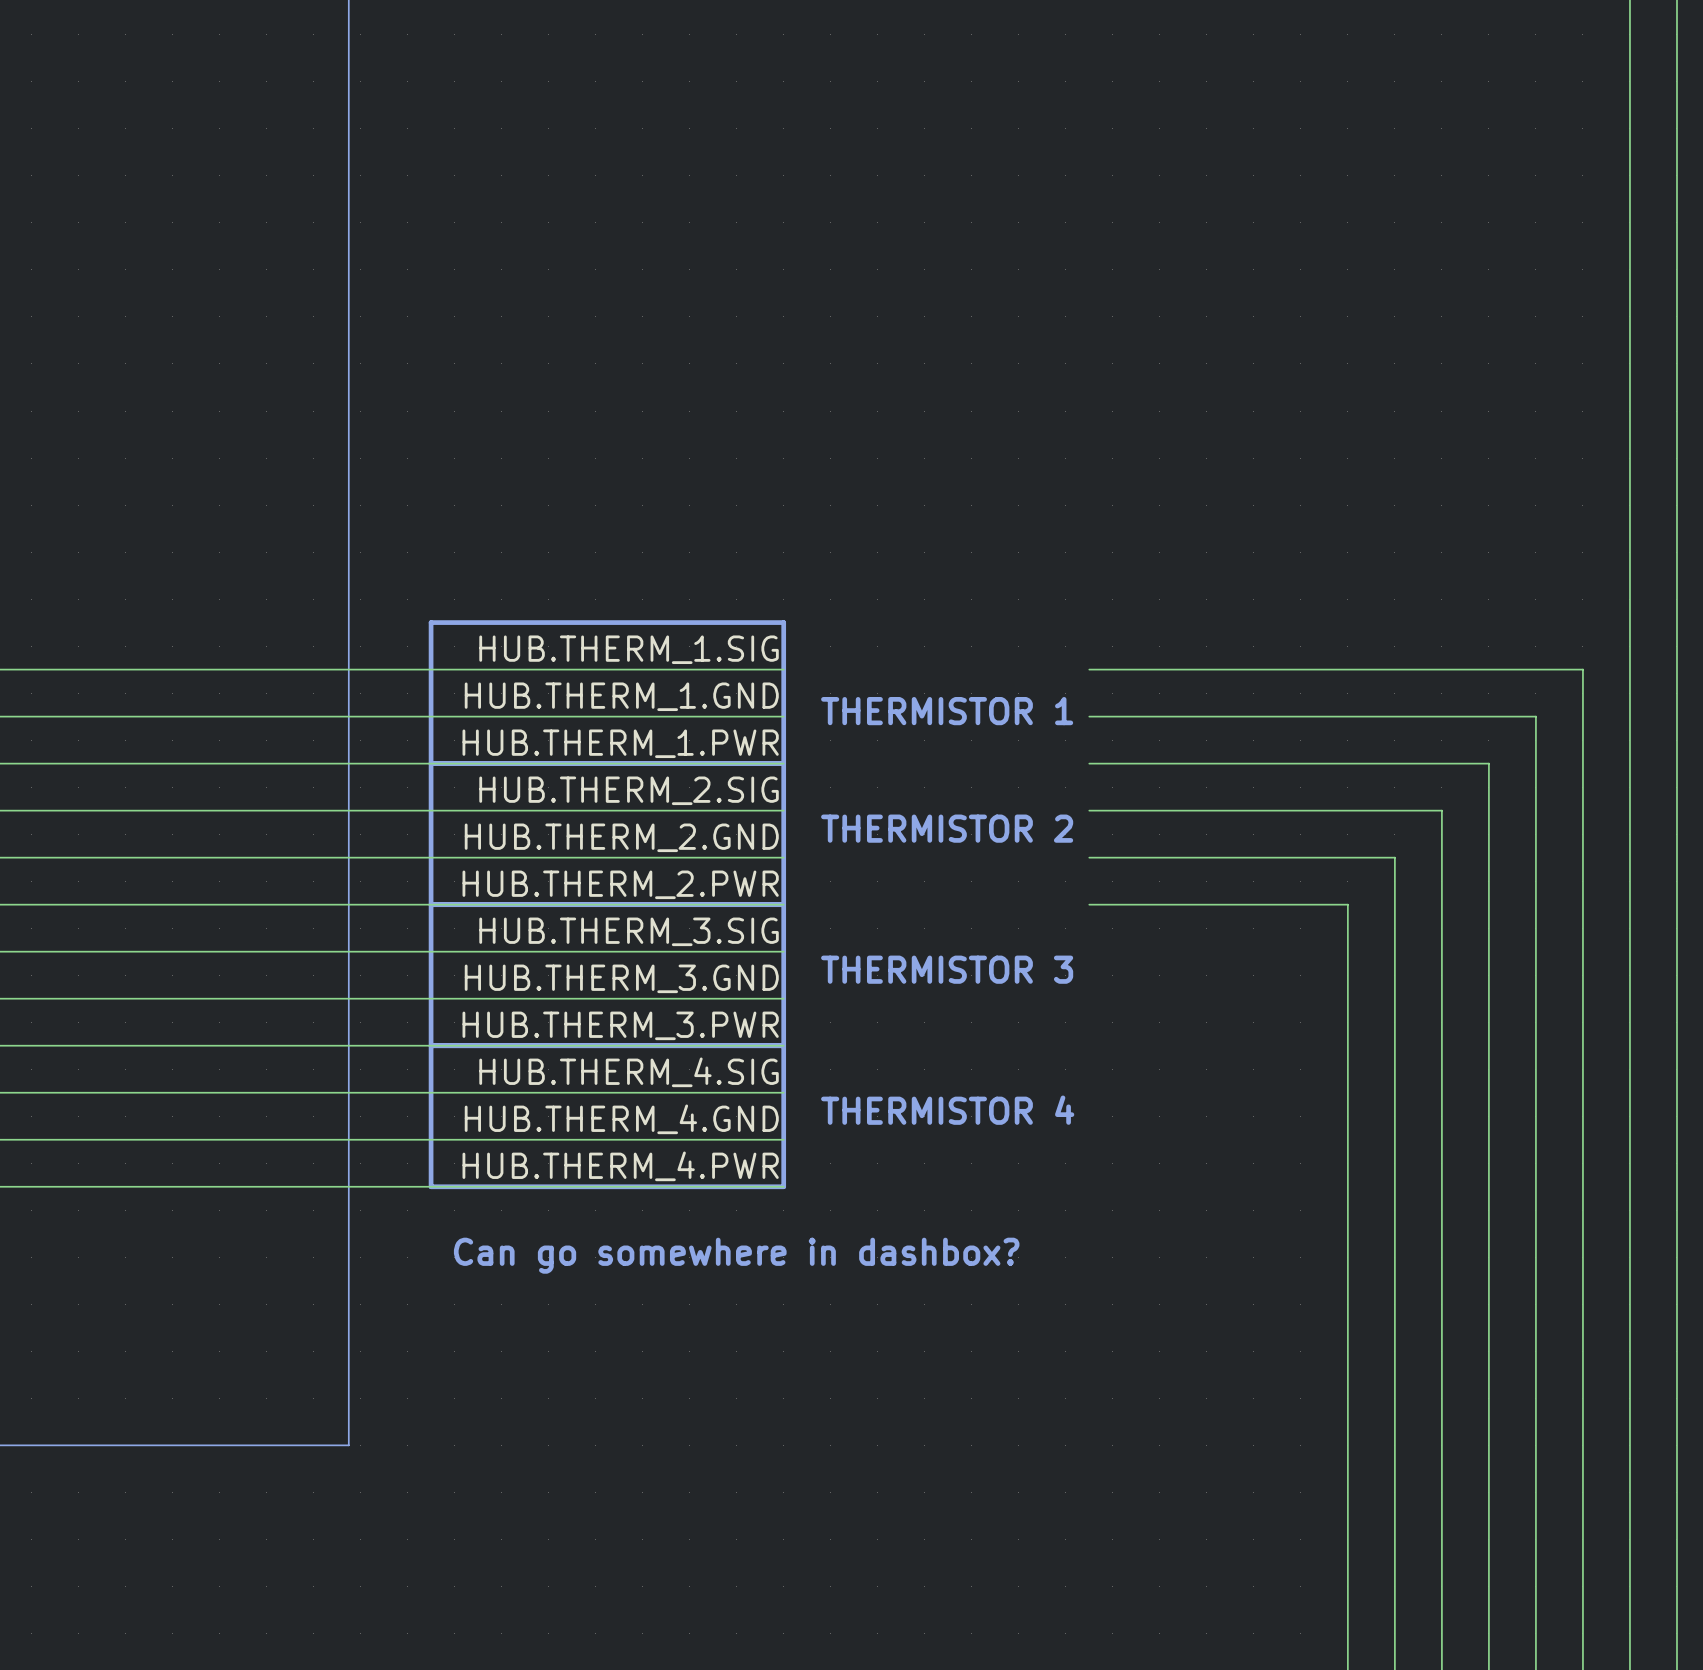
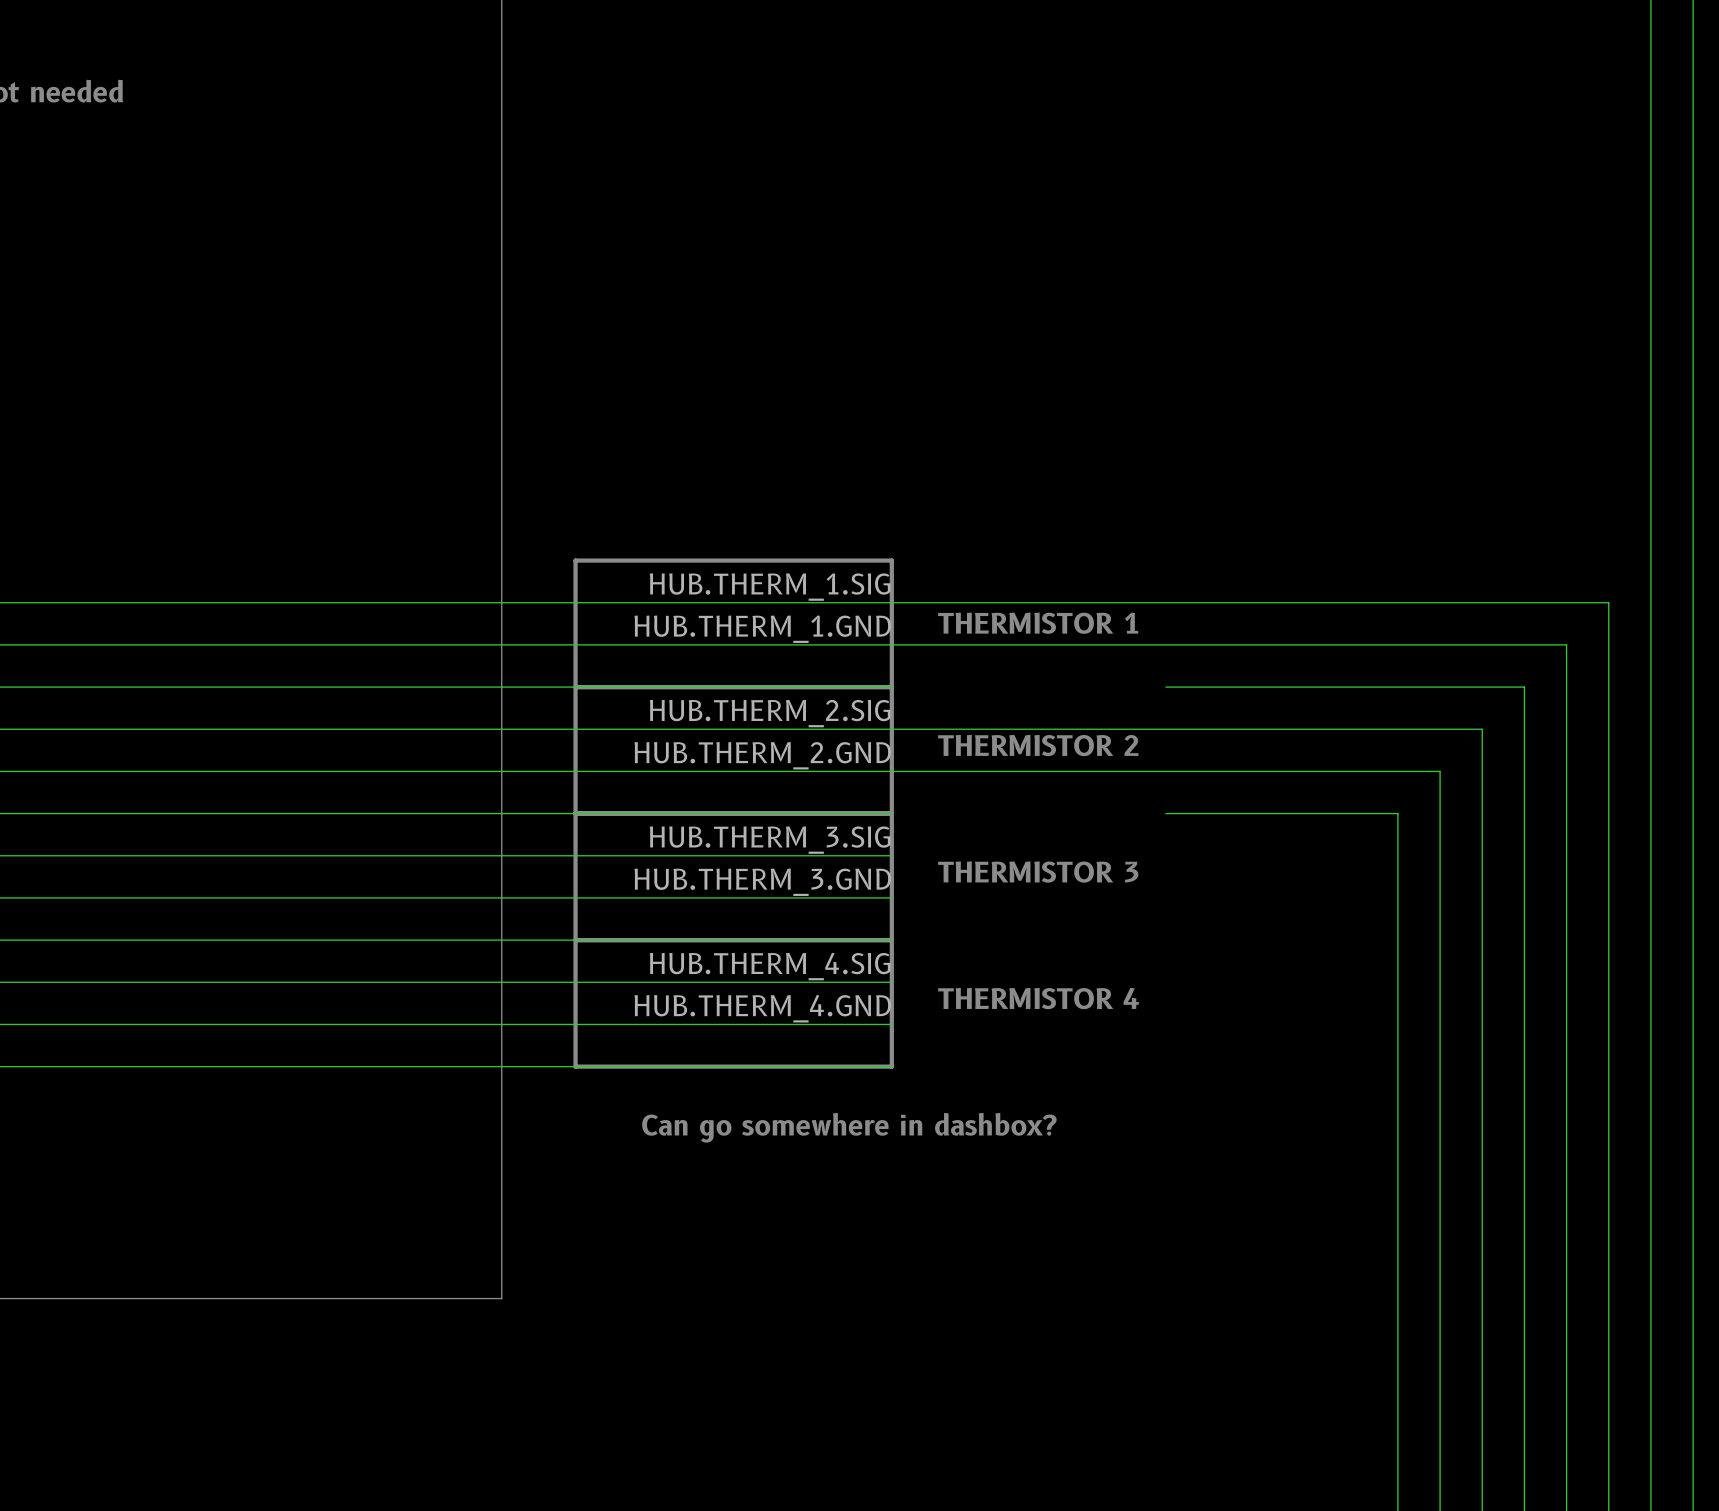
wire: none -> (891, 602) (1165, 602)
text position: THERMISTOR 1 (947, 711) -> THERMISTOR 1 (1038, 623)
wire: none -> (891, 644) (1165, 644)
label: HUB.THERM_1.PWR (620, 743) -> none
wire: none -> (891, 729) (1165, 729)
wire: none -> (891, 771) (1165, 771)
label: HUB.THERM_2.PWR (620, 884) -> none
label: HUB.THERM_3.PWR (620, 1025) -> none
label: HUB.THERM_4.PWR (620, 1166) -> none

